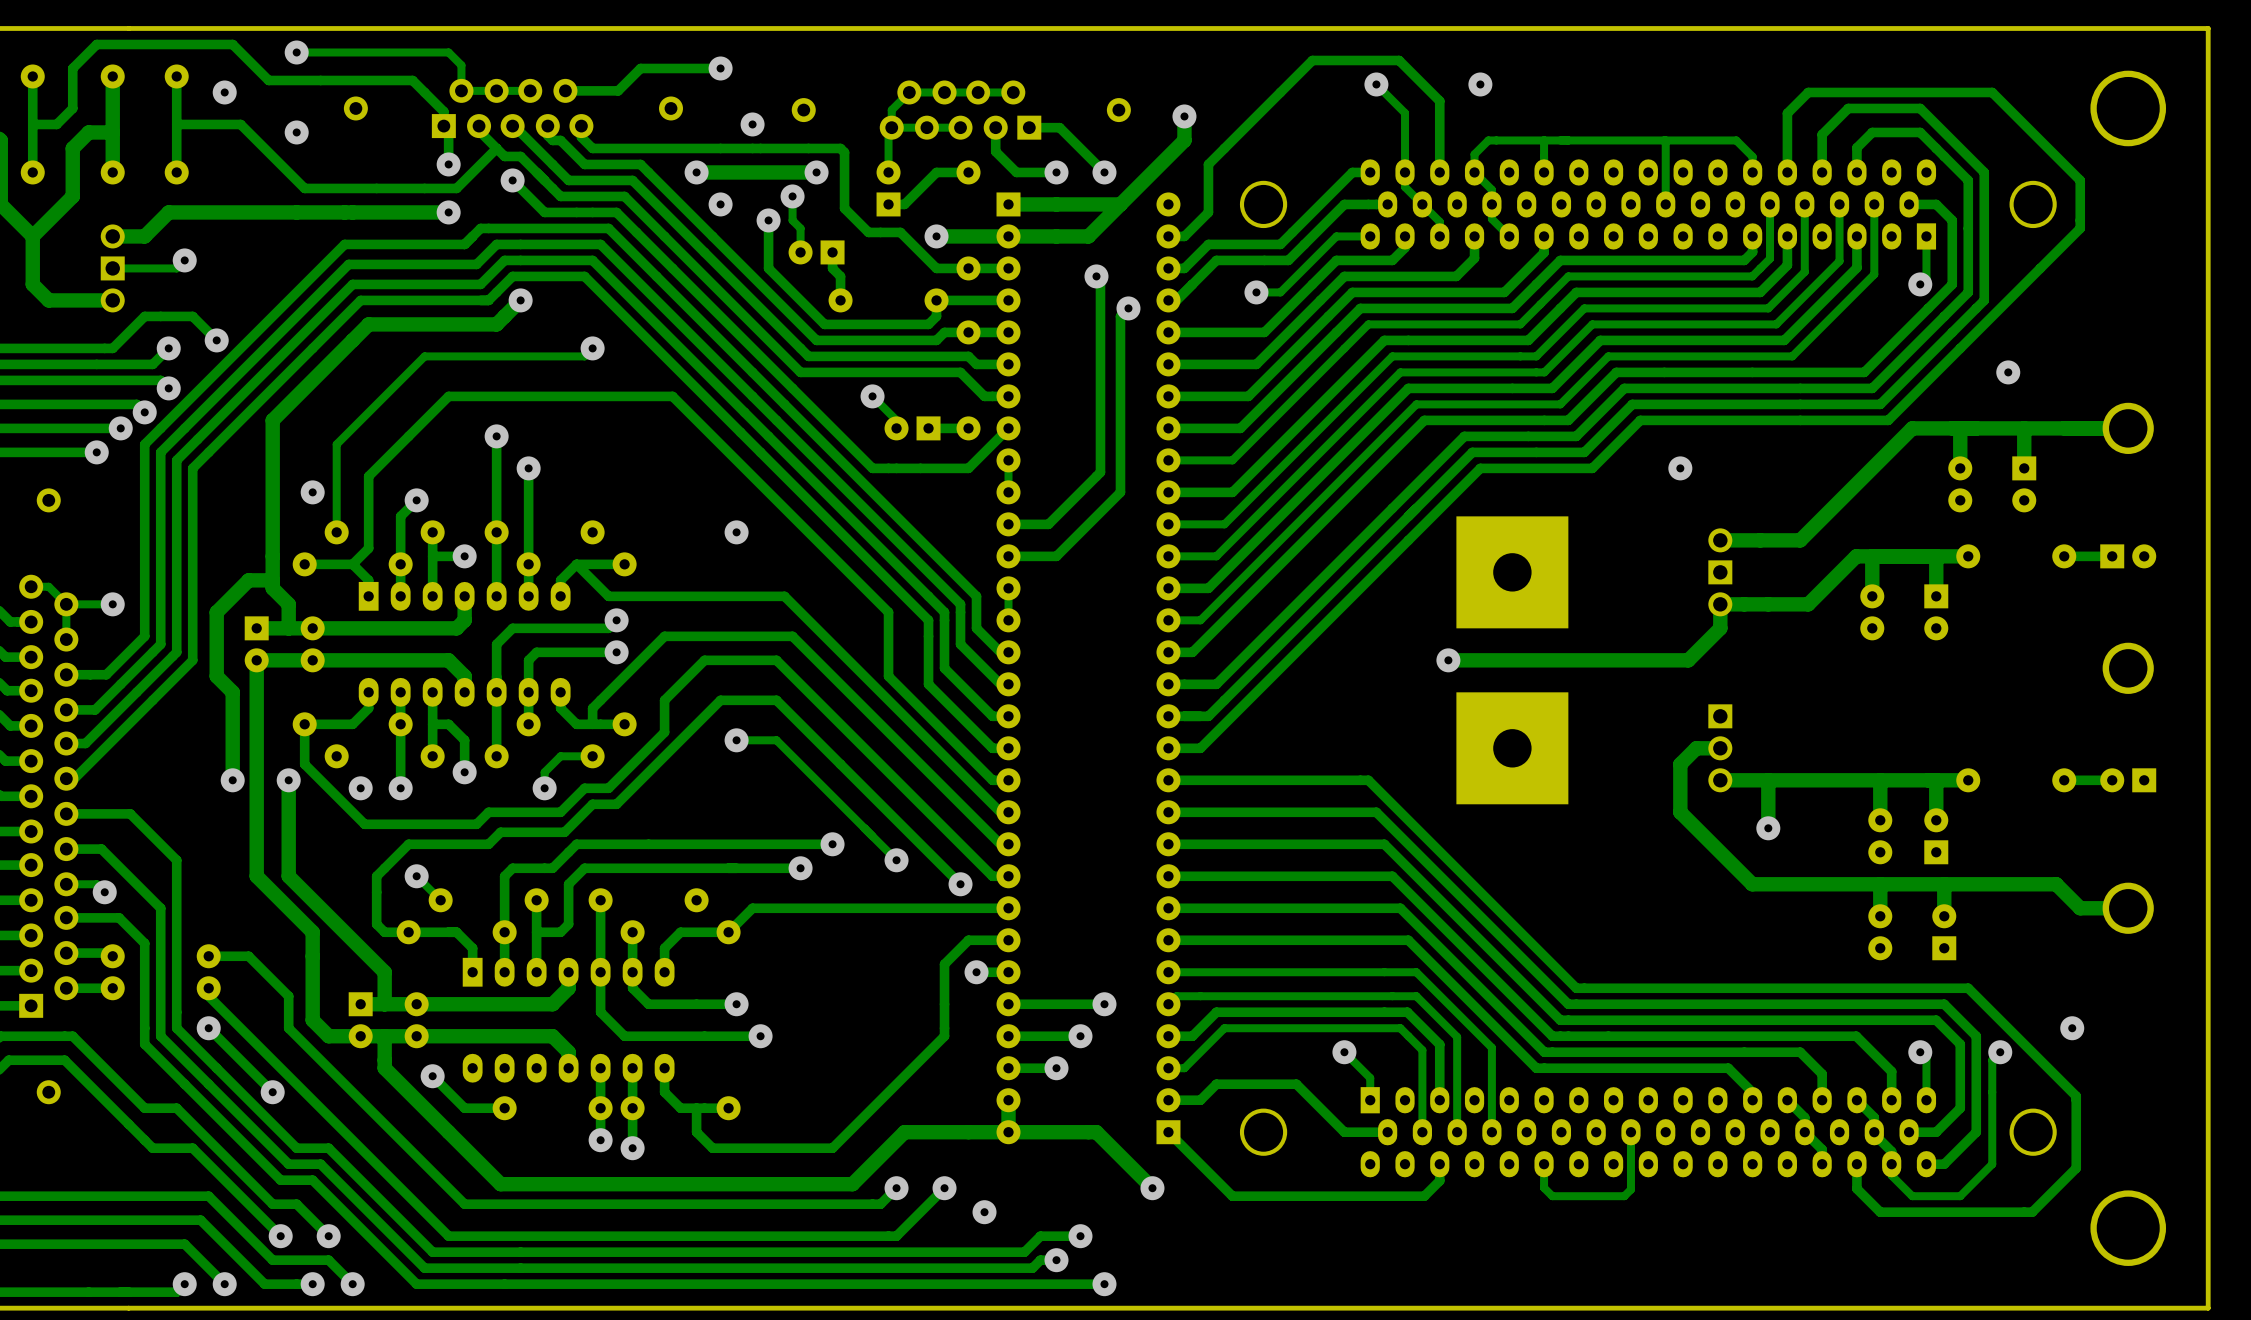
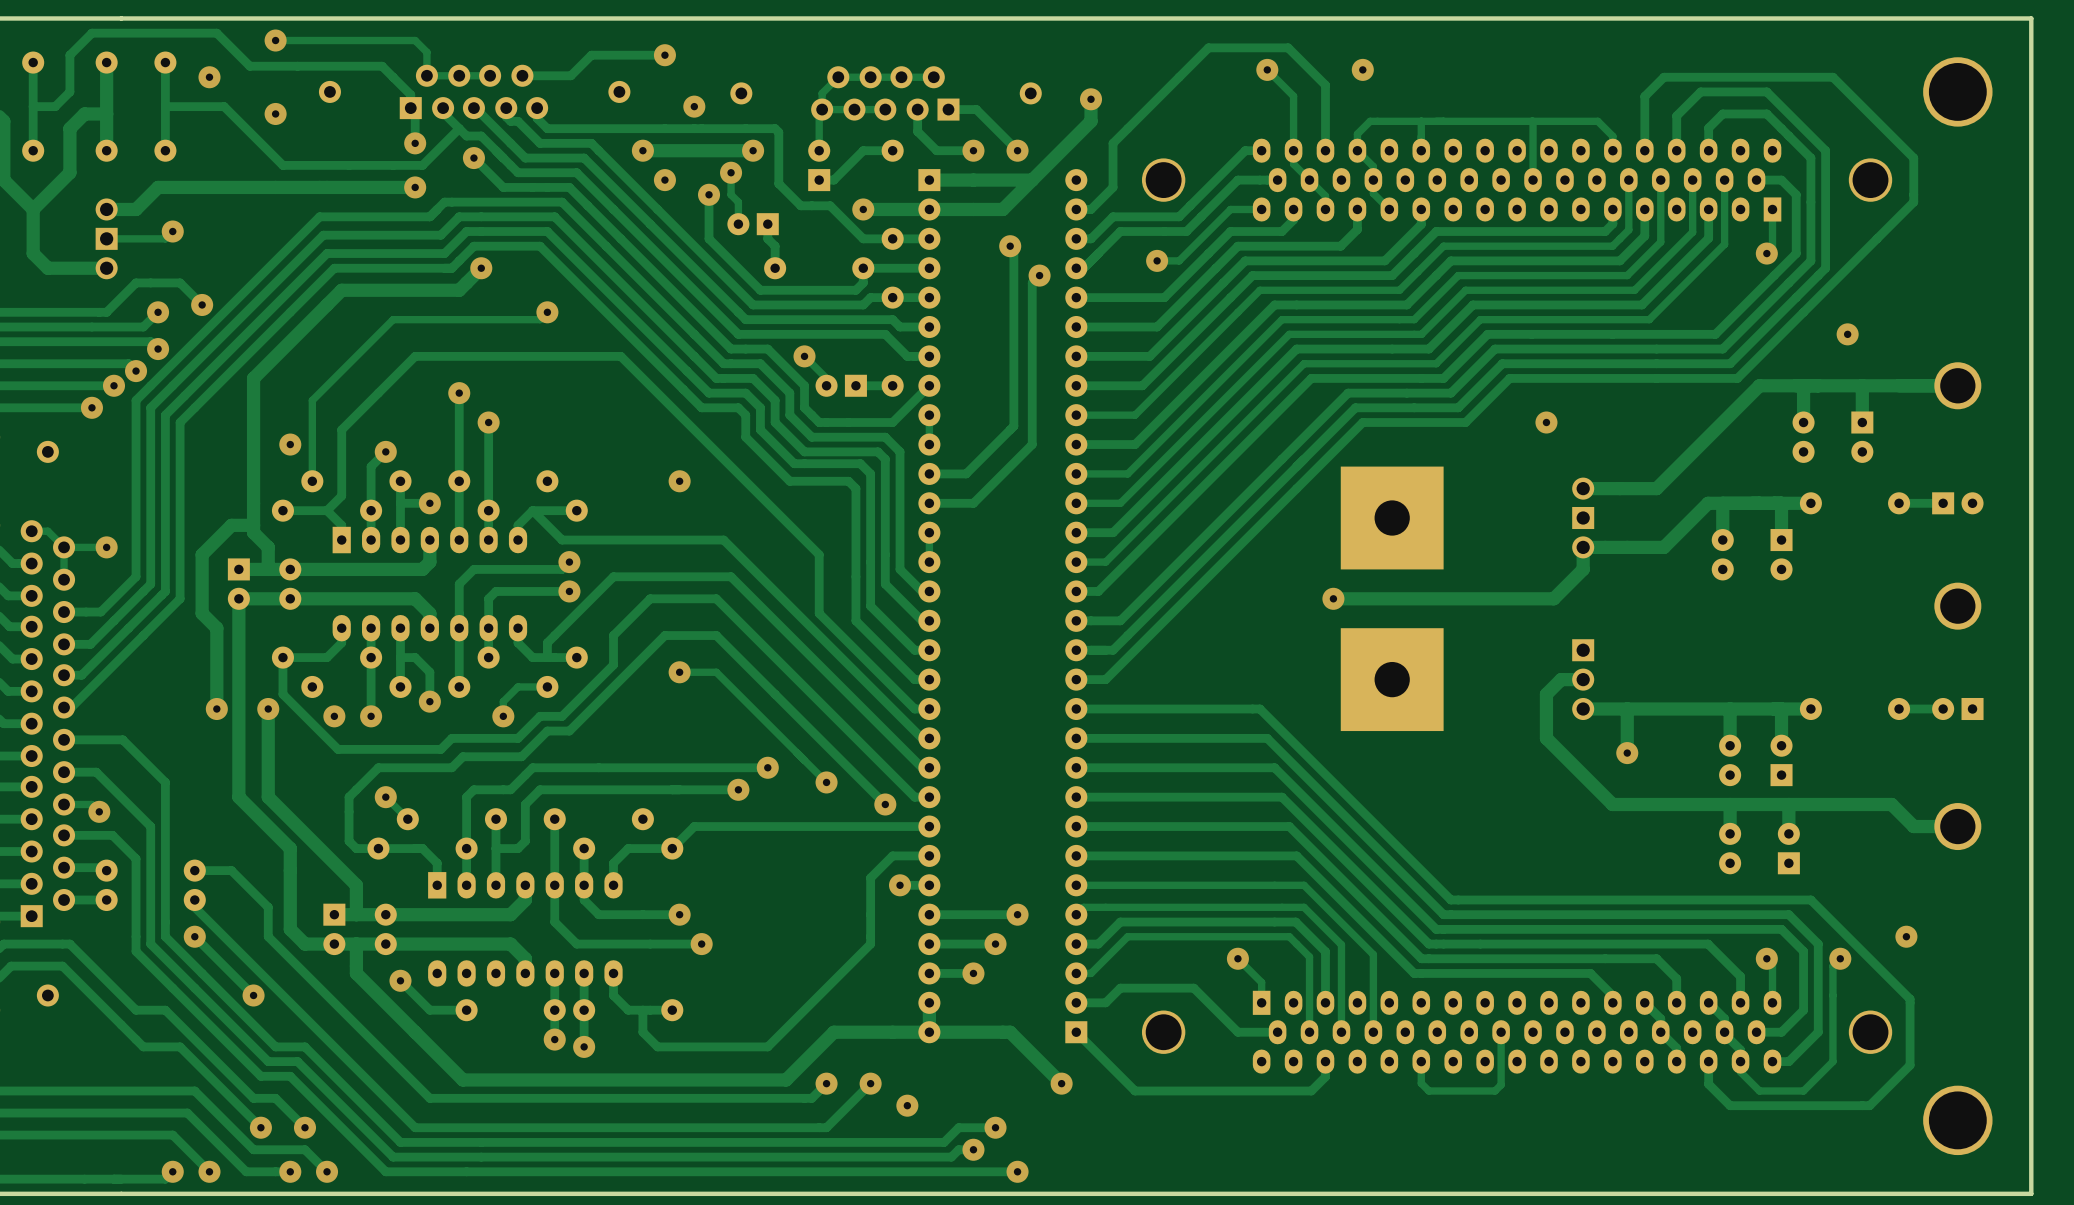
track: (792, 388) (872, 468) (888, 468) -> (731, 349) (767, 349) (804, 385) (804, 407) (819, 422)
track: (784, 404) (976, 596) -> (723, 363) (760, 363) (789, 393) (789, 415) (811, 437) (885, 437) (900, 451) (900, 540)
track: (776, 420) (960, 604) -> (716, 378) (753, 378) (775, 400) (775, 422) (804, 451) (877, 451) (885, 459) (885, 547)
track: (768, 436) (944, 612) -> (709, 393) (745, 393) (760, 407) (760, 429) (794, 463) (860, 463) (870, 473) (870, 554)
track: (760, 452) (928, 620) -> (701, 407) (738, 407) (745, 415) (745, 437) (789, 481) (848, 481) (855, 488) (855, 562)

